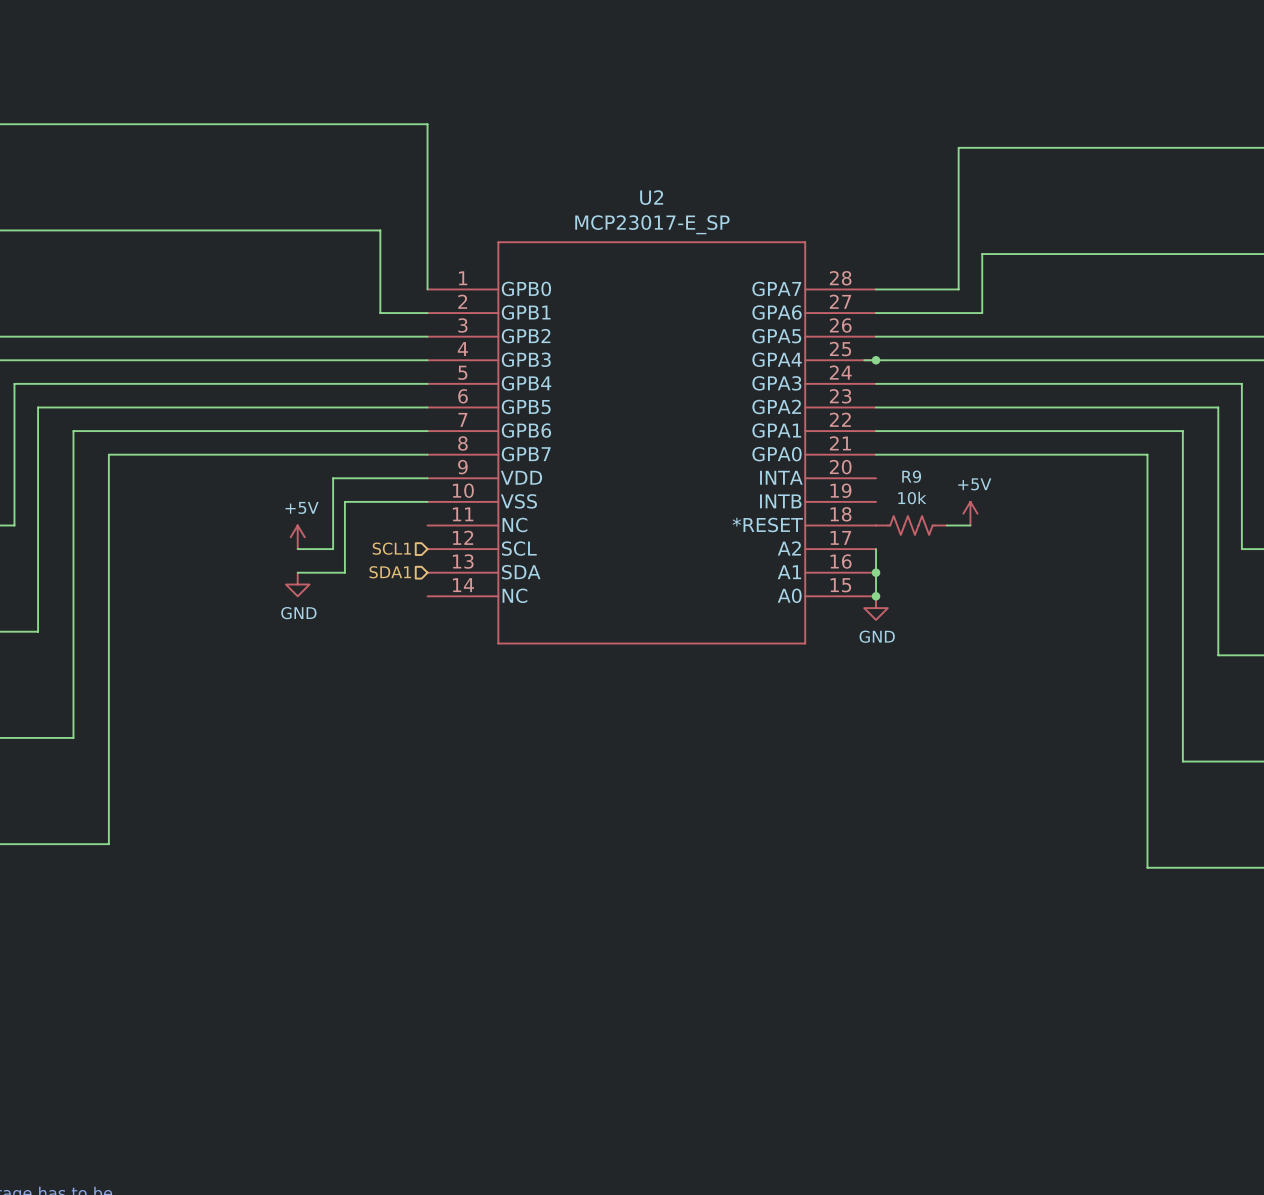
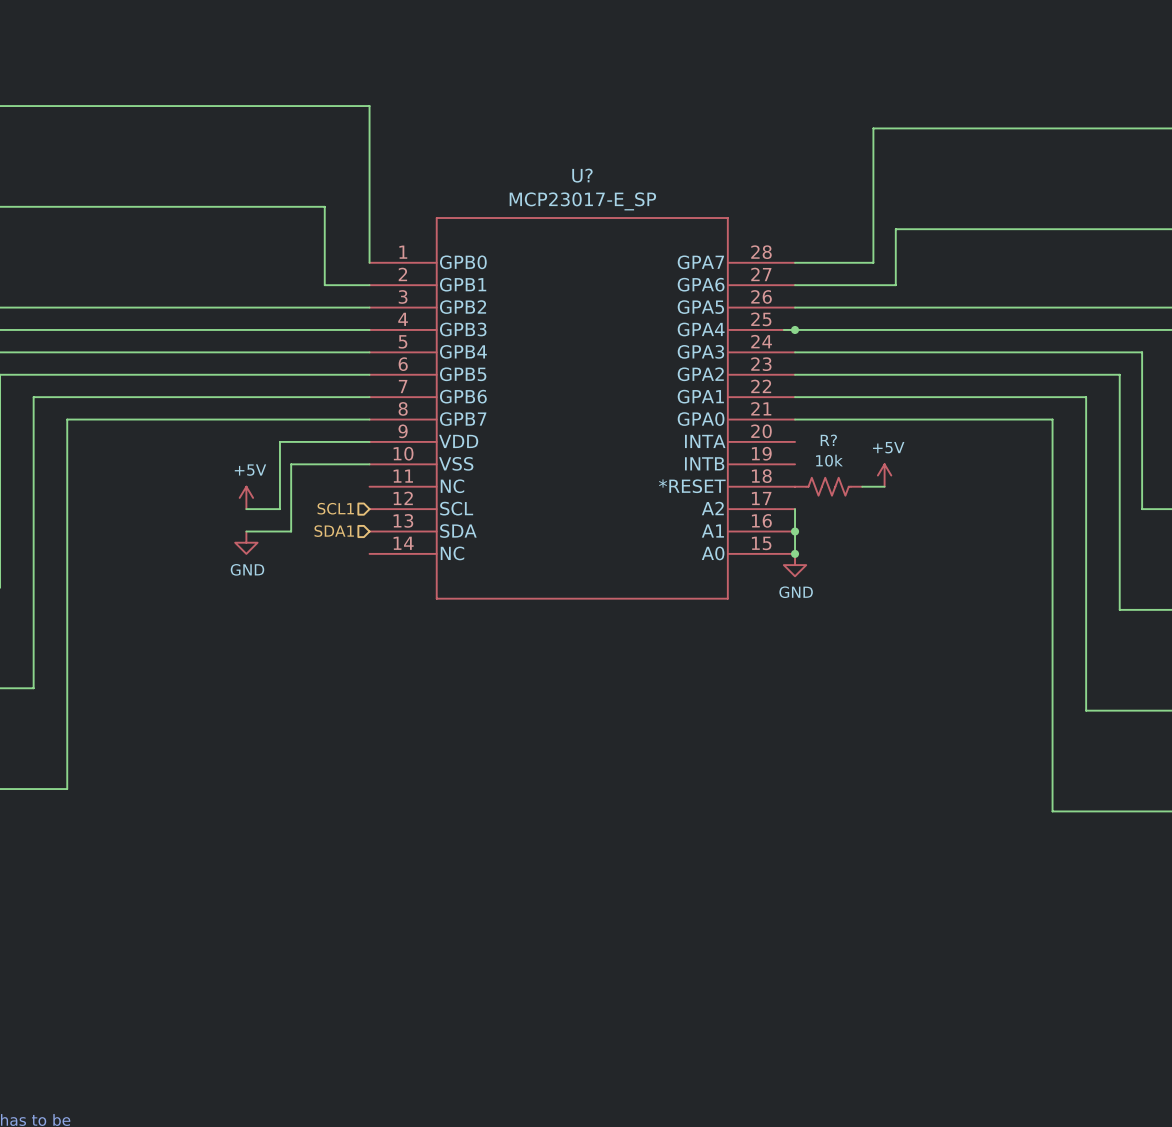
U2 name: U2 (651, 197) -> U? (582, 175)
R9 name: R9 (911, 476) -> R? (828, 440)

